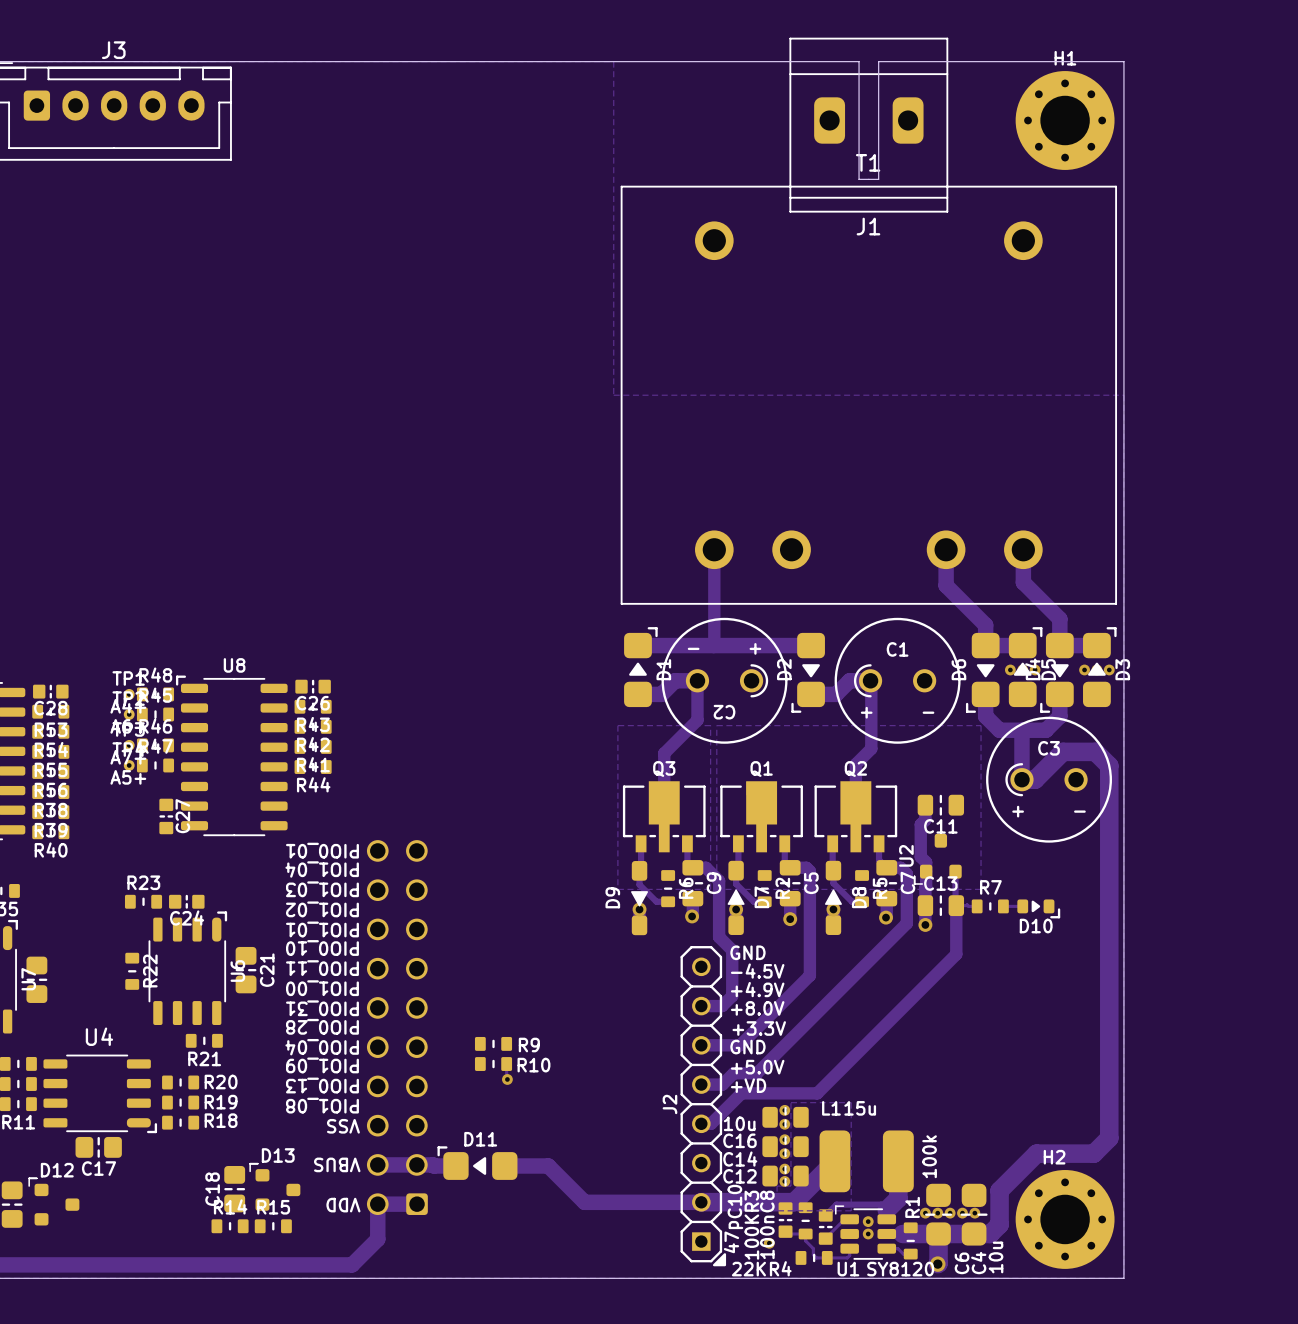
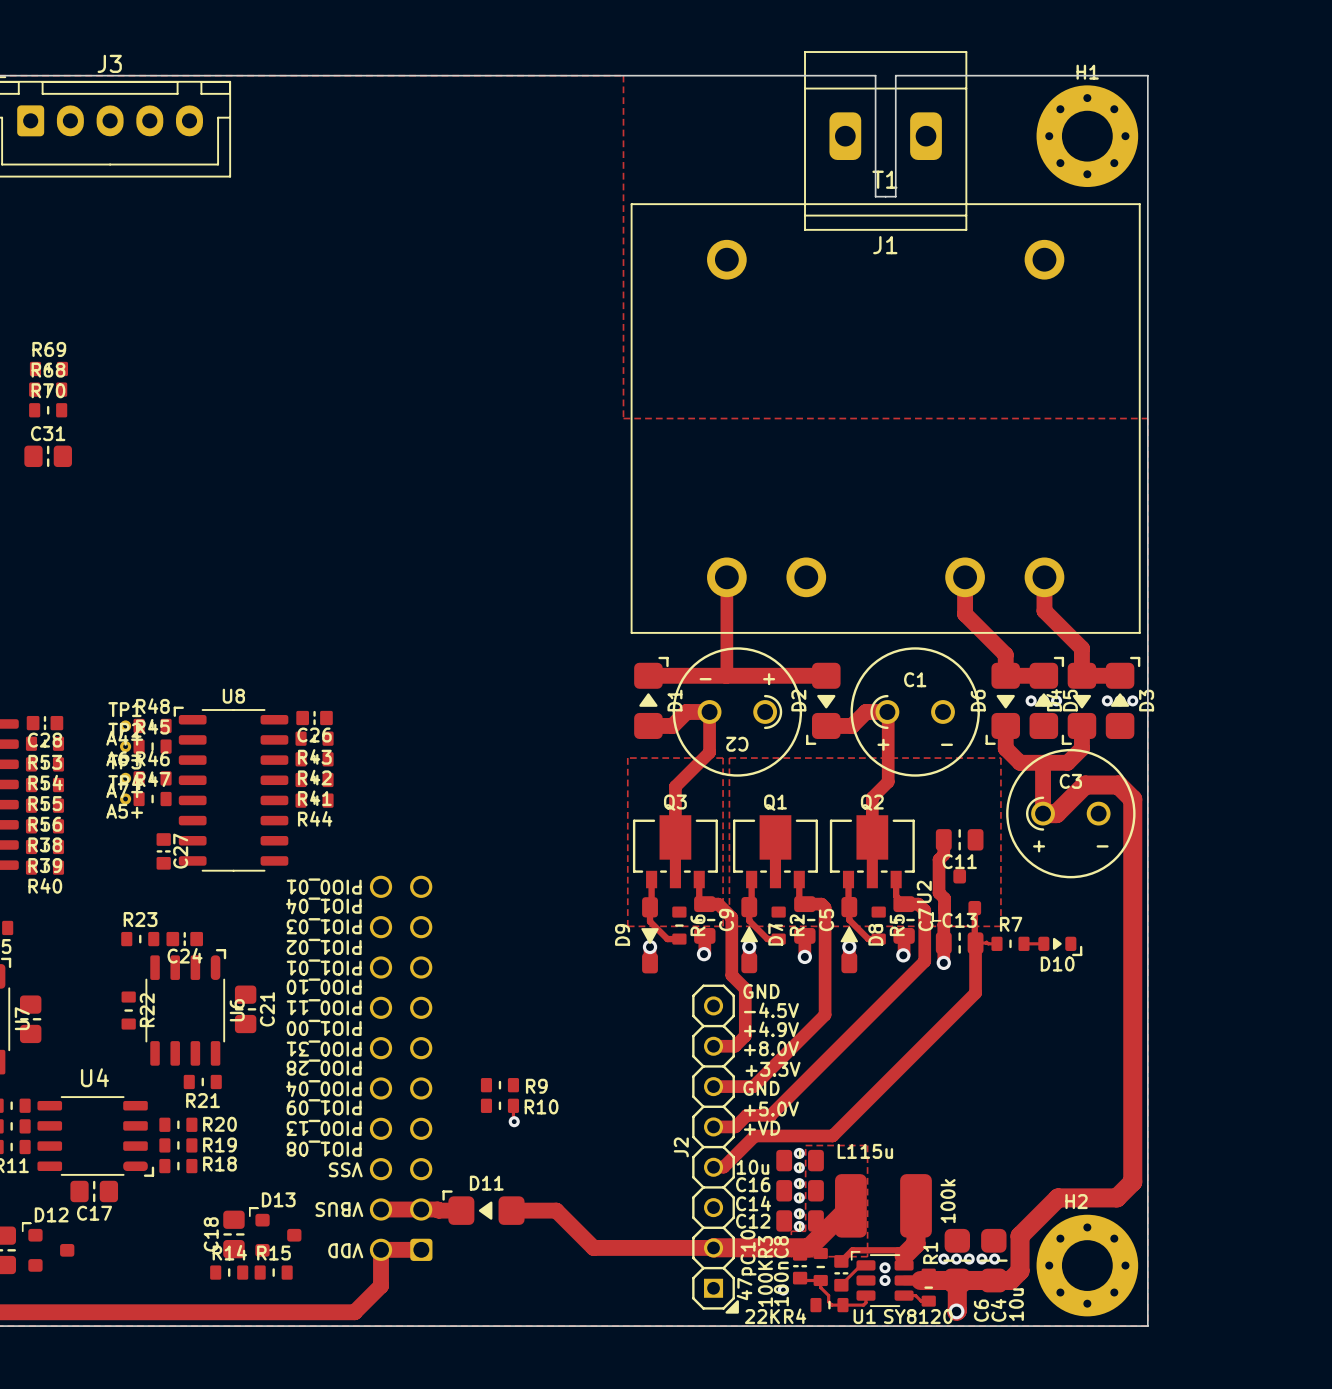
R69: none -> (48, 368)
R68: none -> (48, 389)
R70: none -> (48, 410)
C31: none -> (48, 456)

